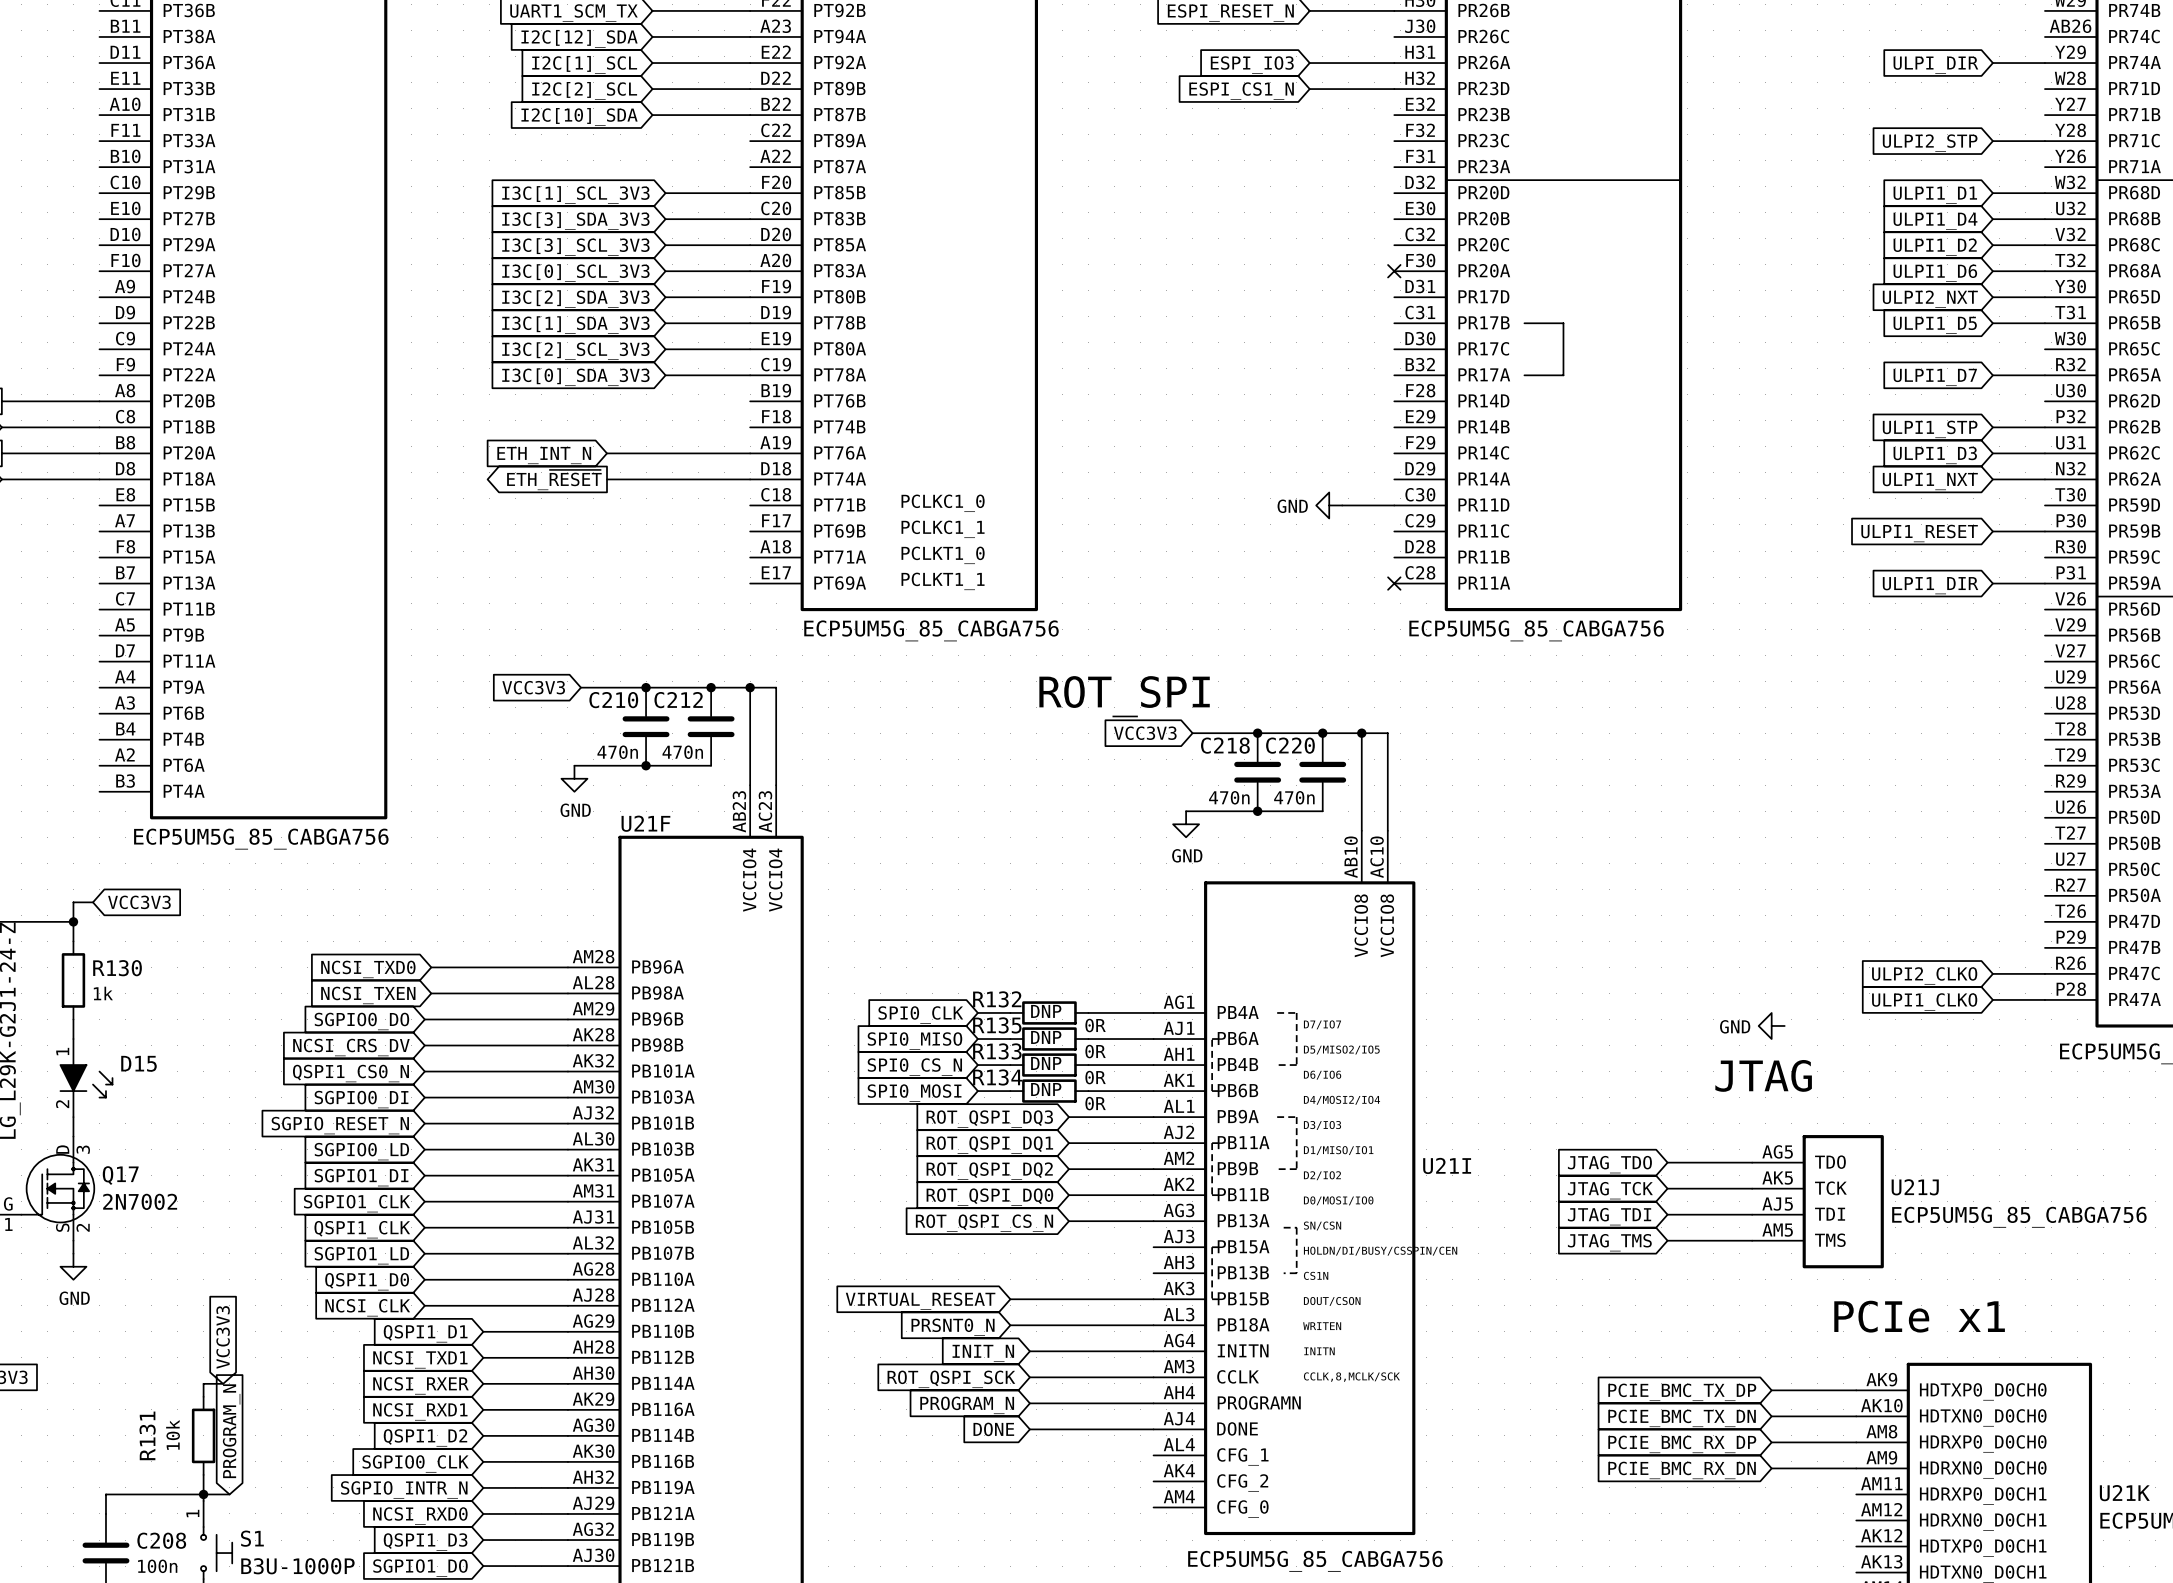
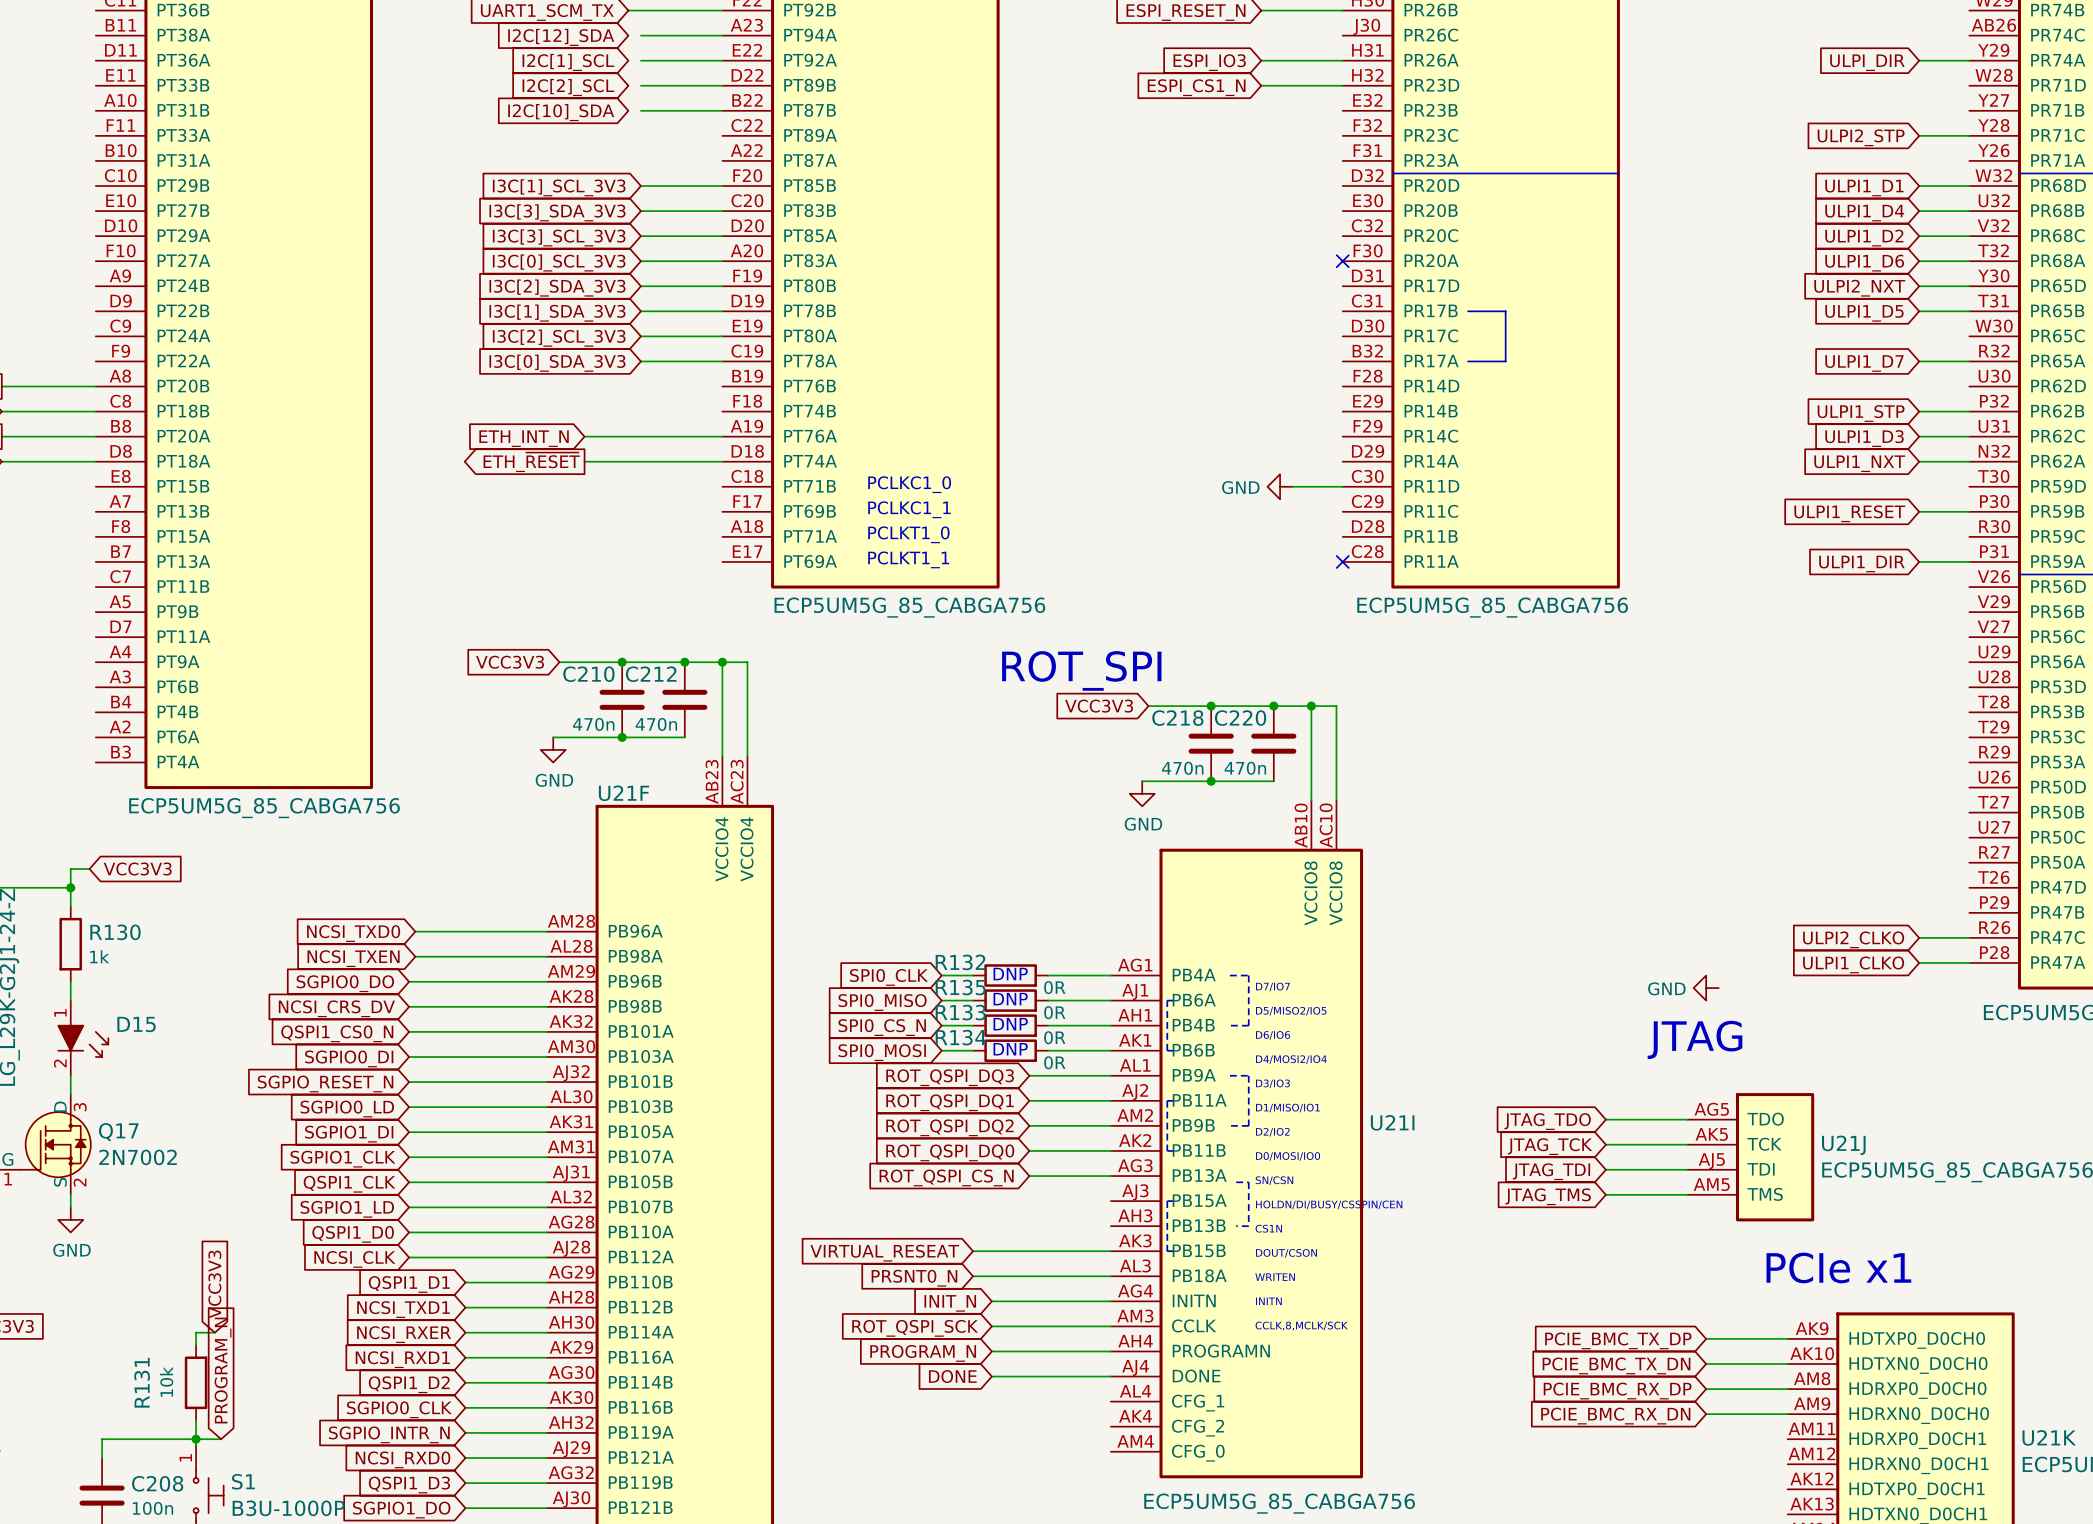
wire: (652, 36) (665, 36) -> none
wire: (652, 63) (665, 63) -> none
wire: (652, 89) (665, 89) -> none
wire: (652, 115) (665, 115) -> none

